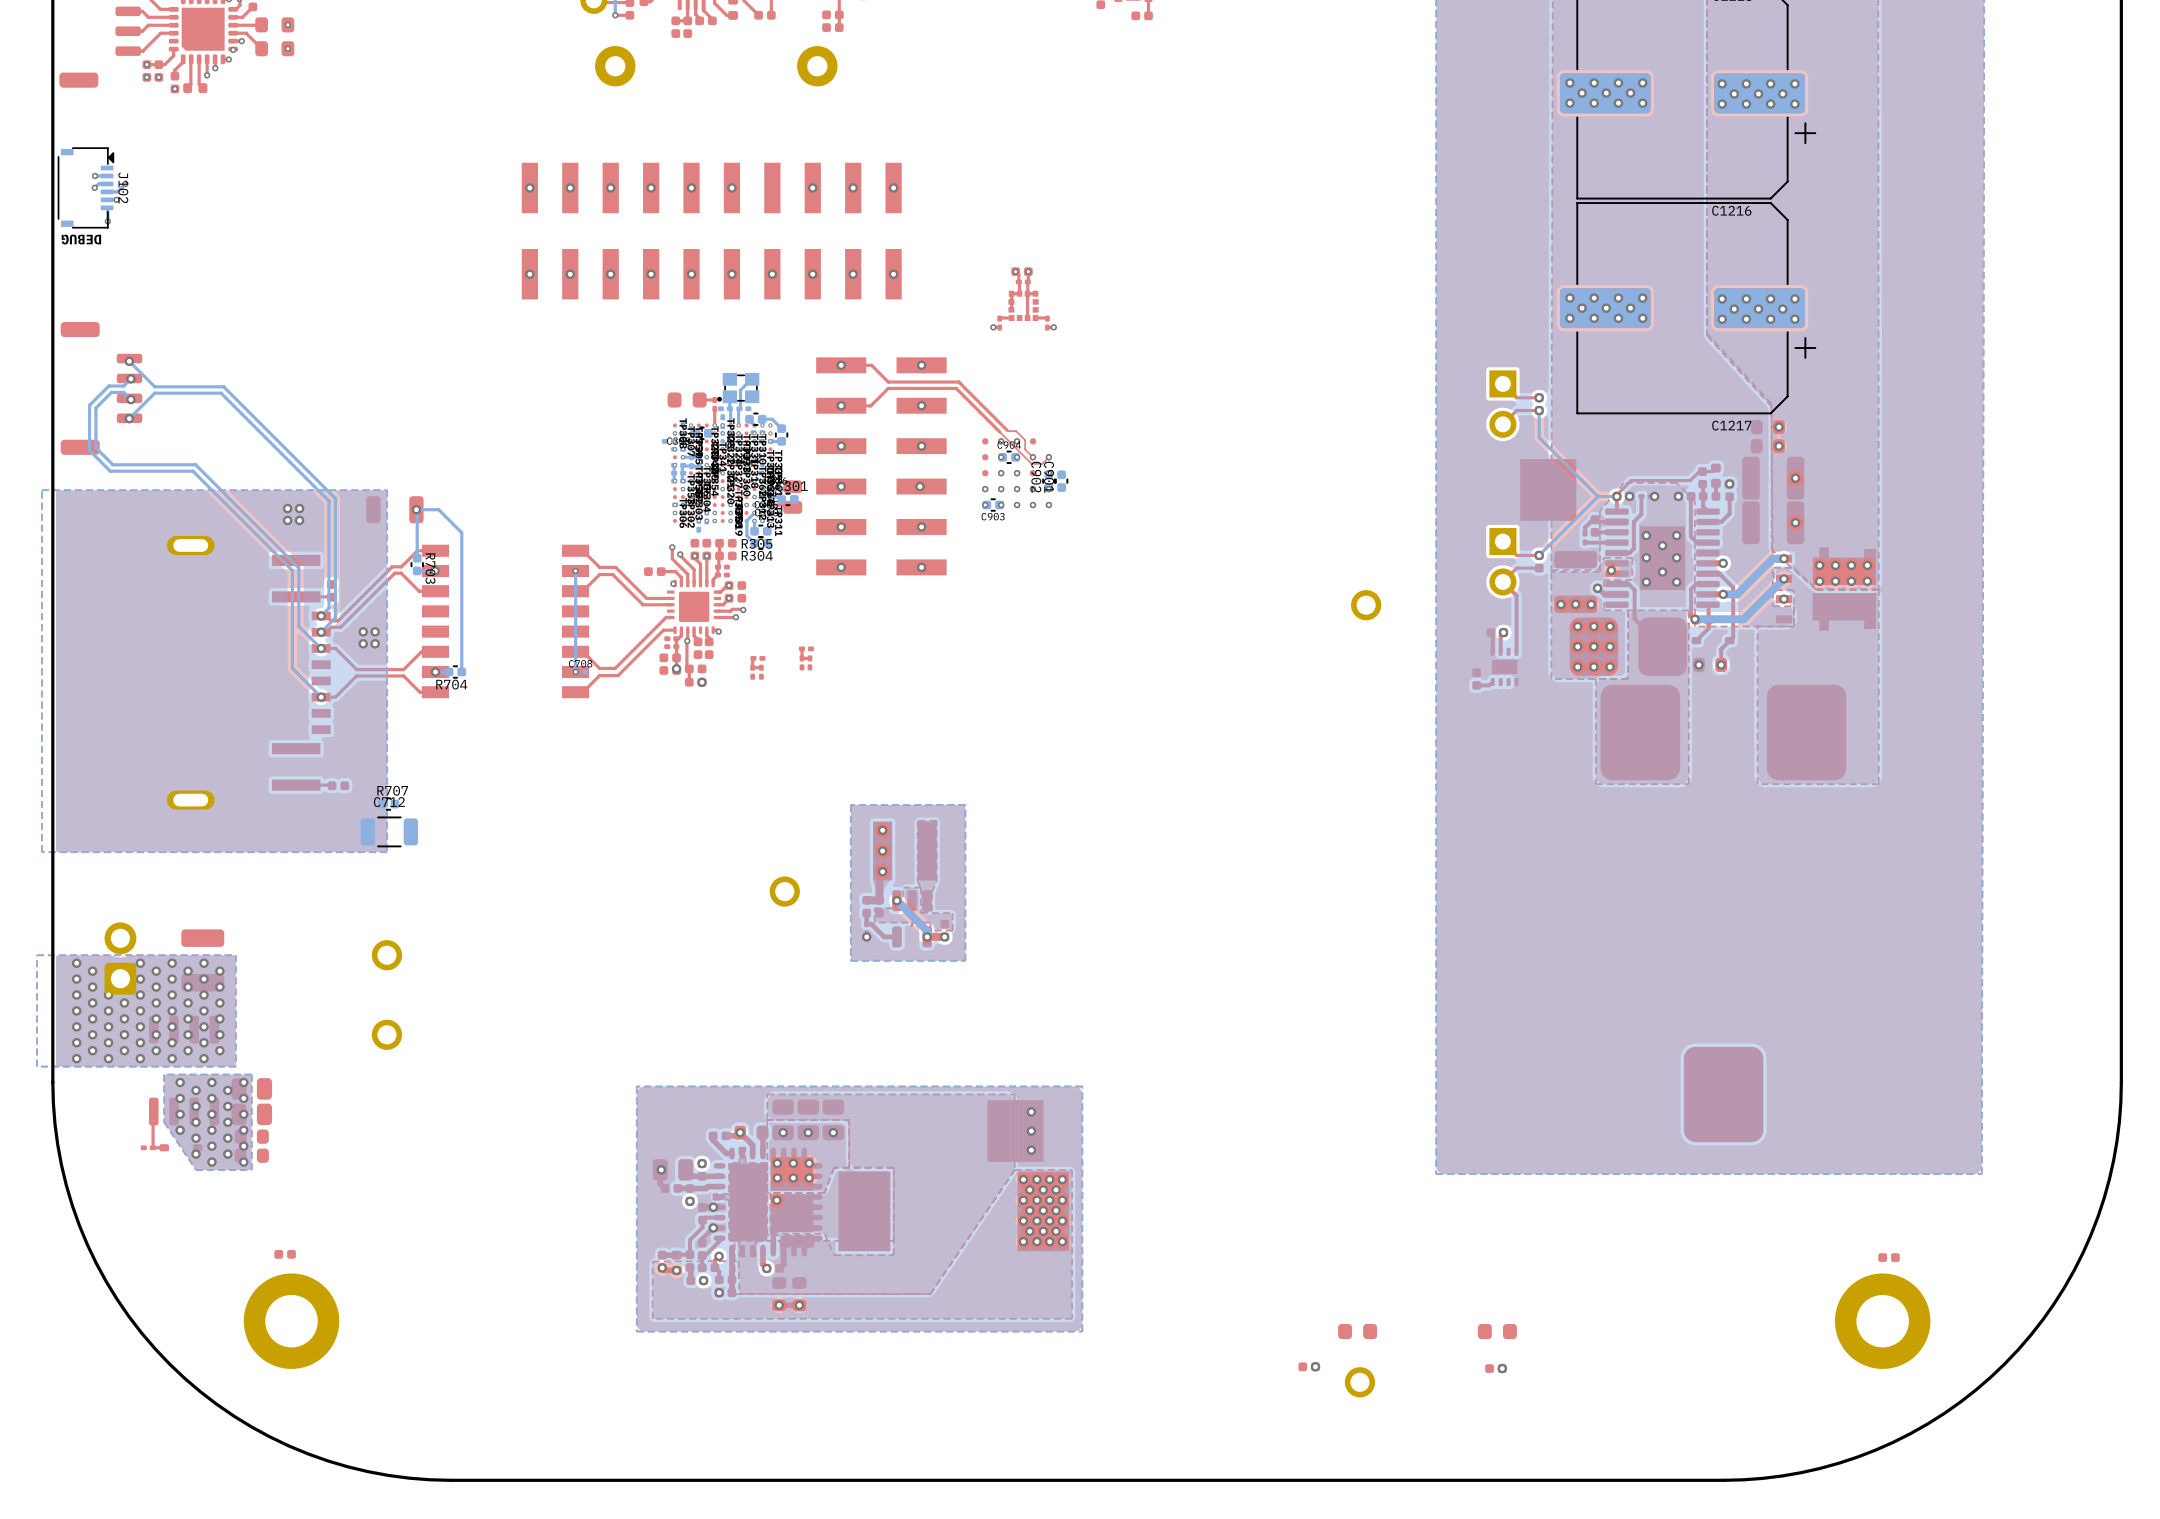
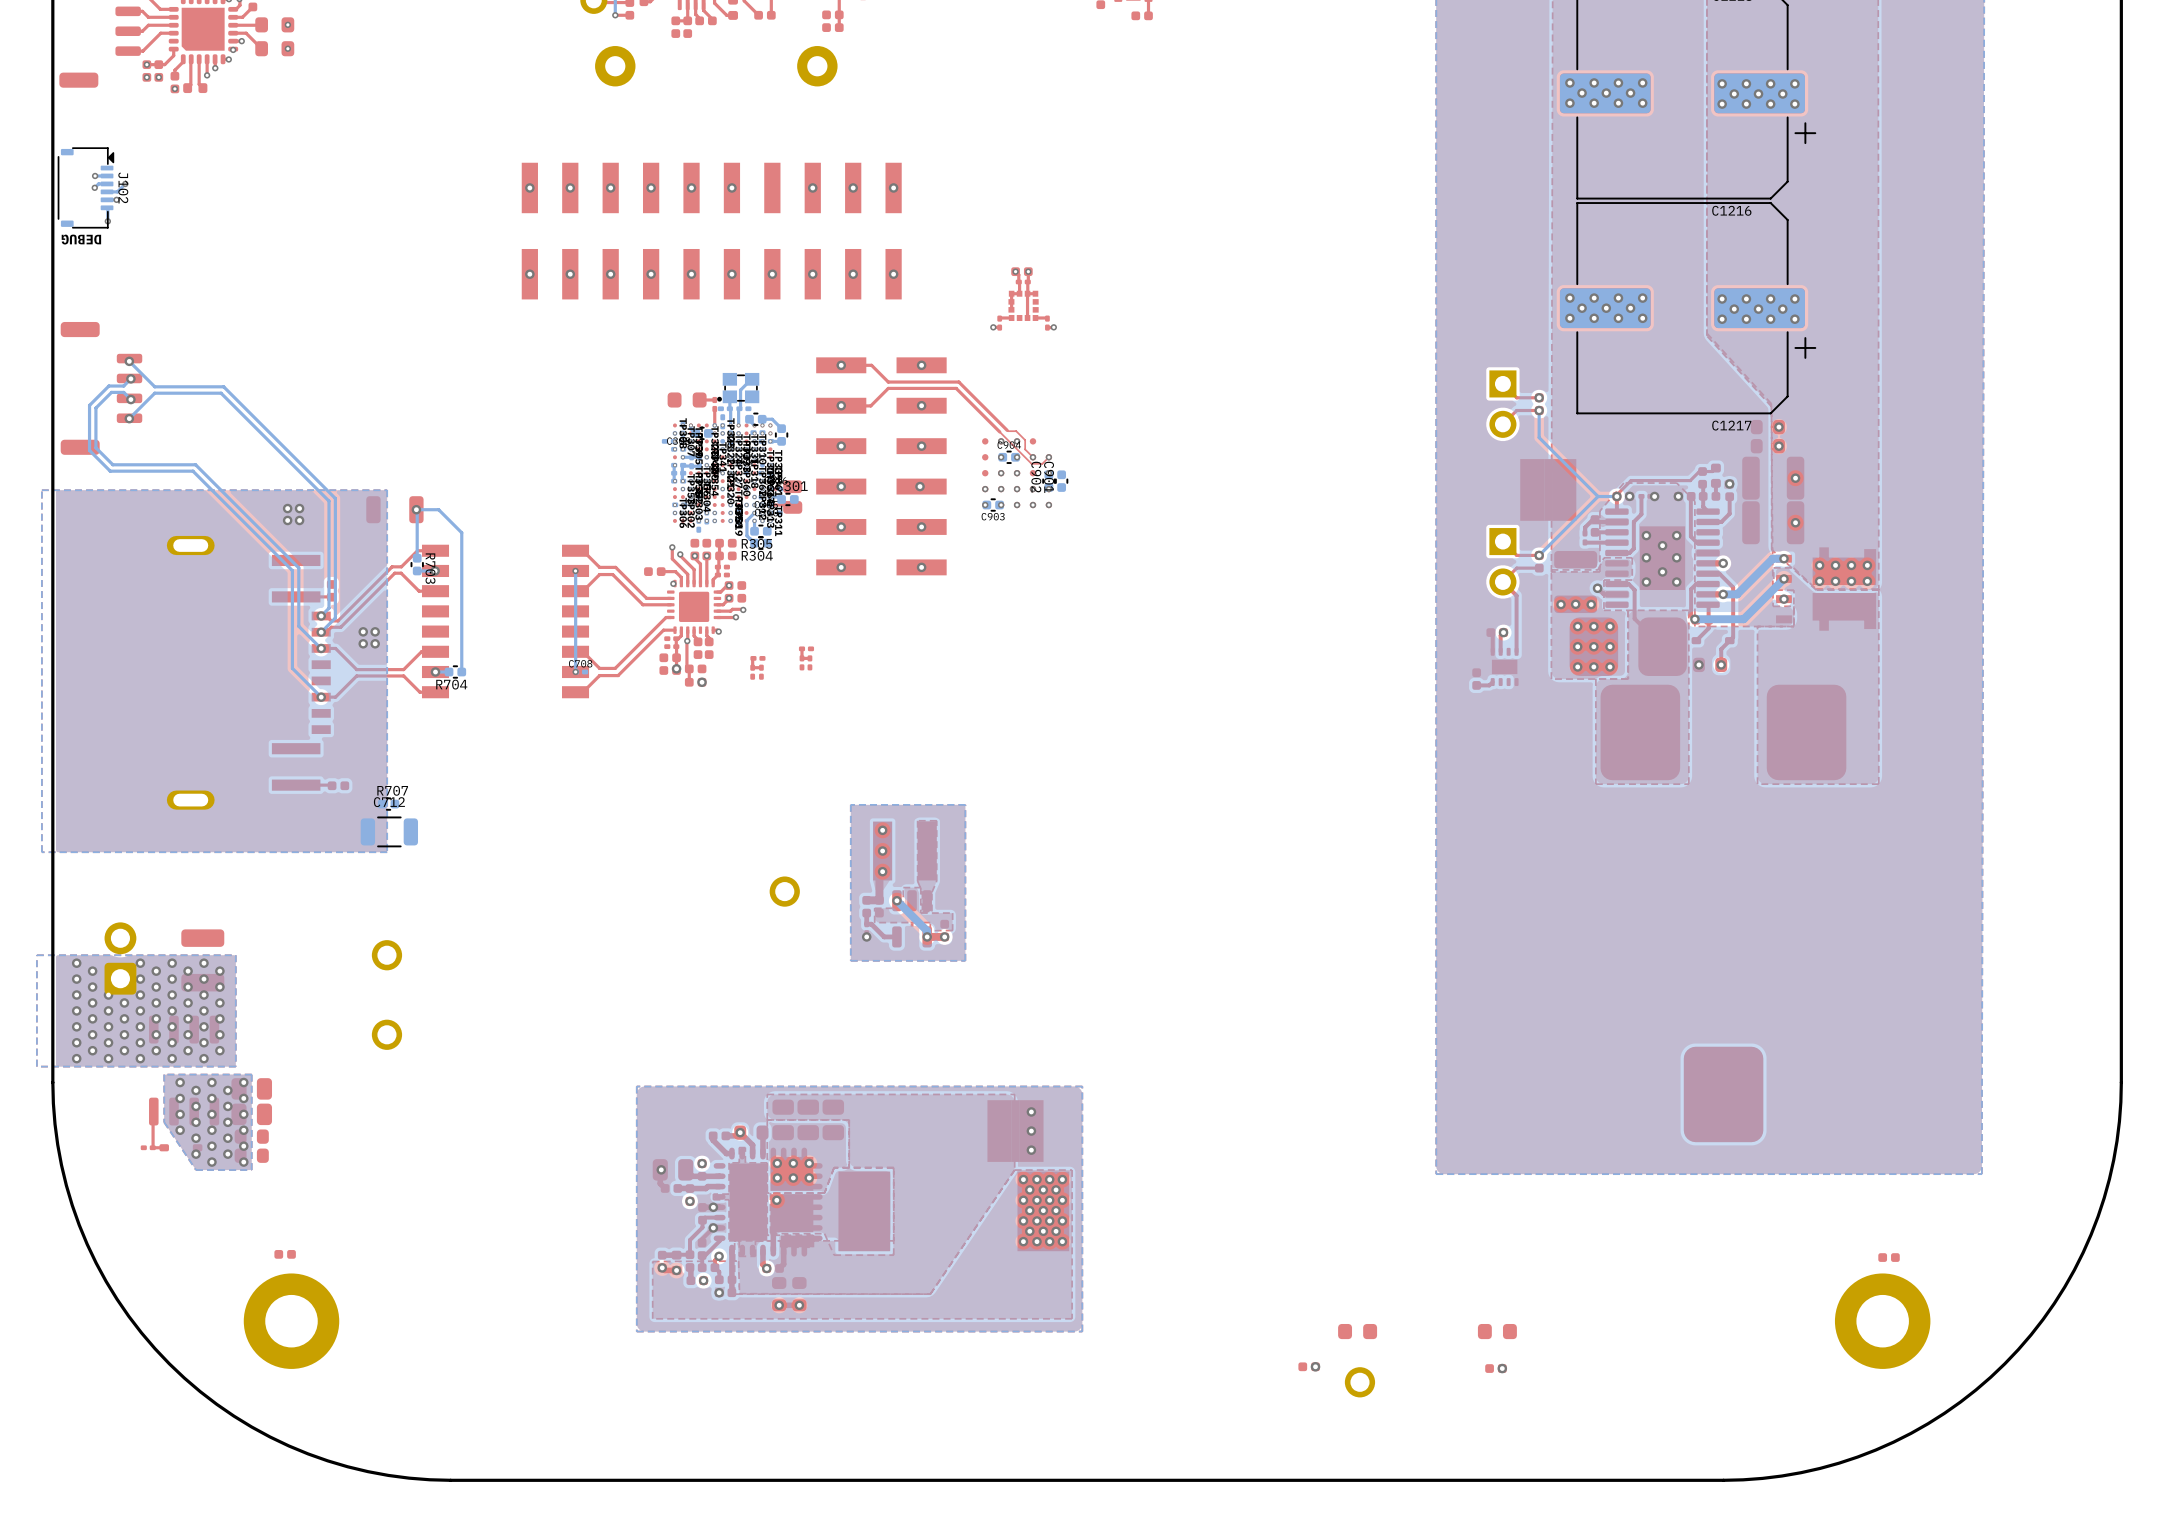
via: (1611, 570) -> none
part: (1366, 605) -> none
via: (783, 1132) -> none
via: (808, 1132) -> none
via: (833, 1132) -> none

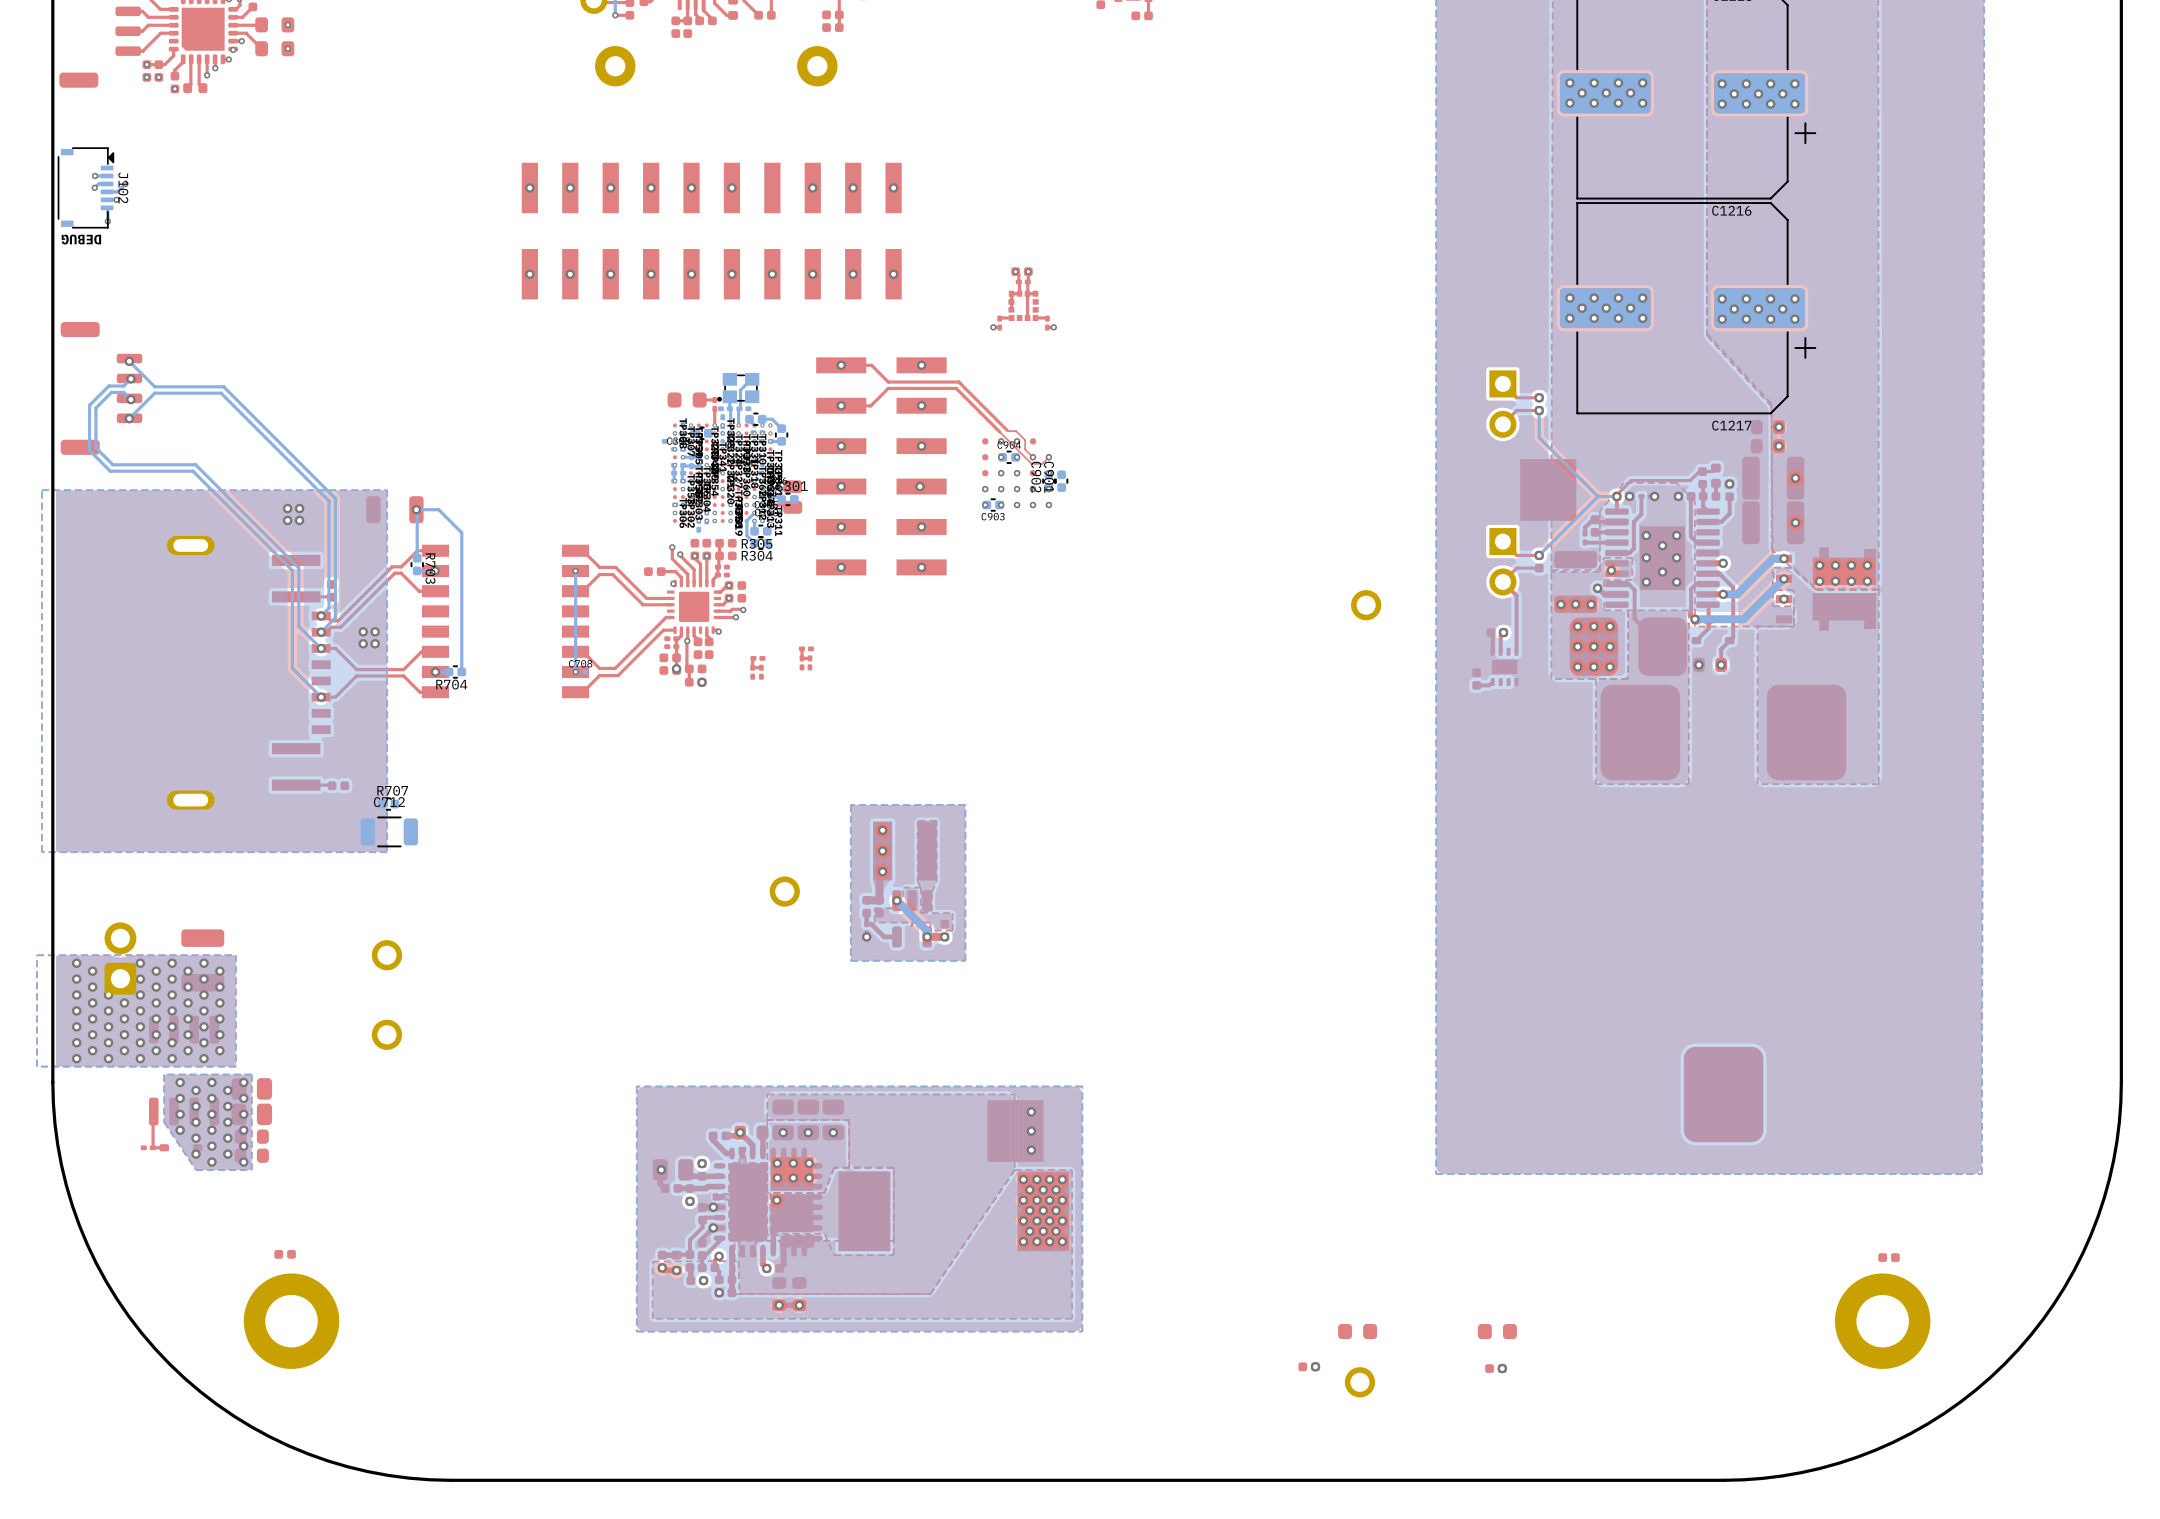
via: none -> (1611, 570)
part: none -> (1366, 605)
via: none -> (783, 1132)
via: none -> (808, 1132)
via: none -> (833, 1132)

